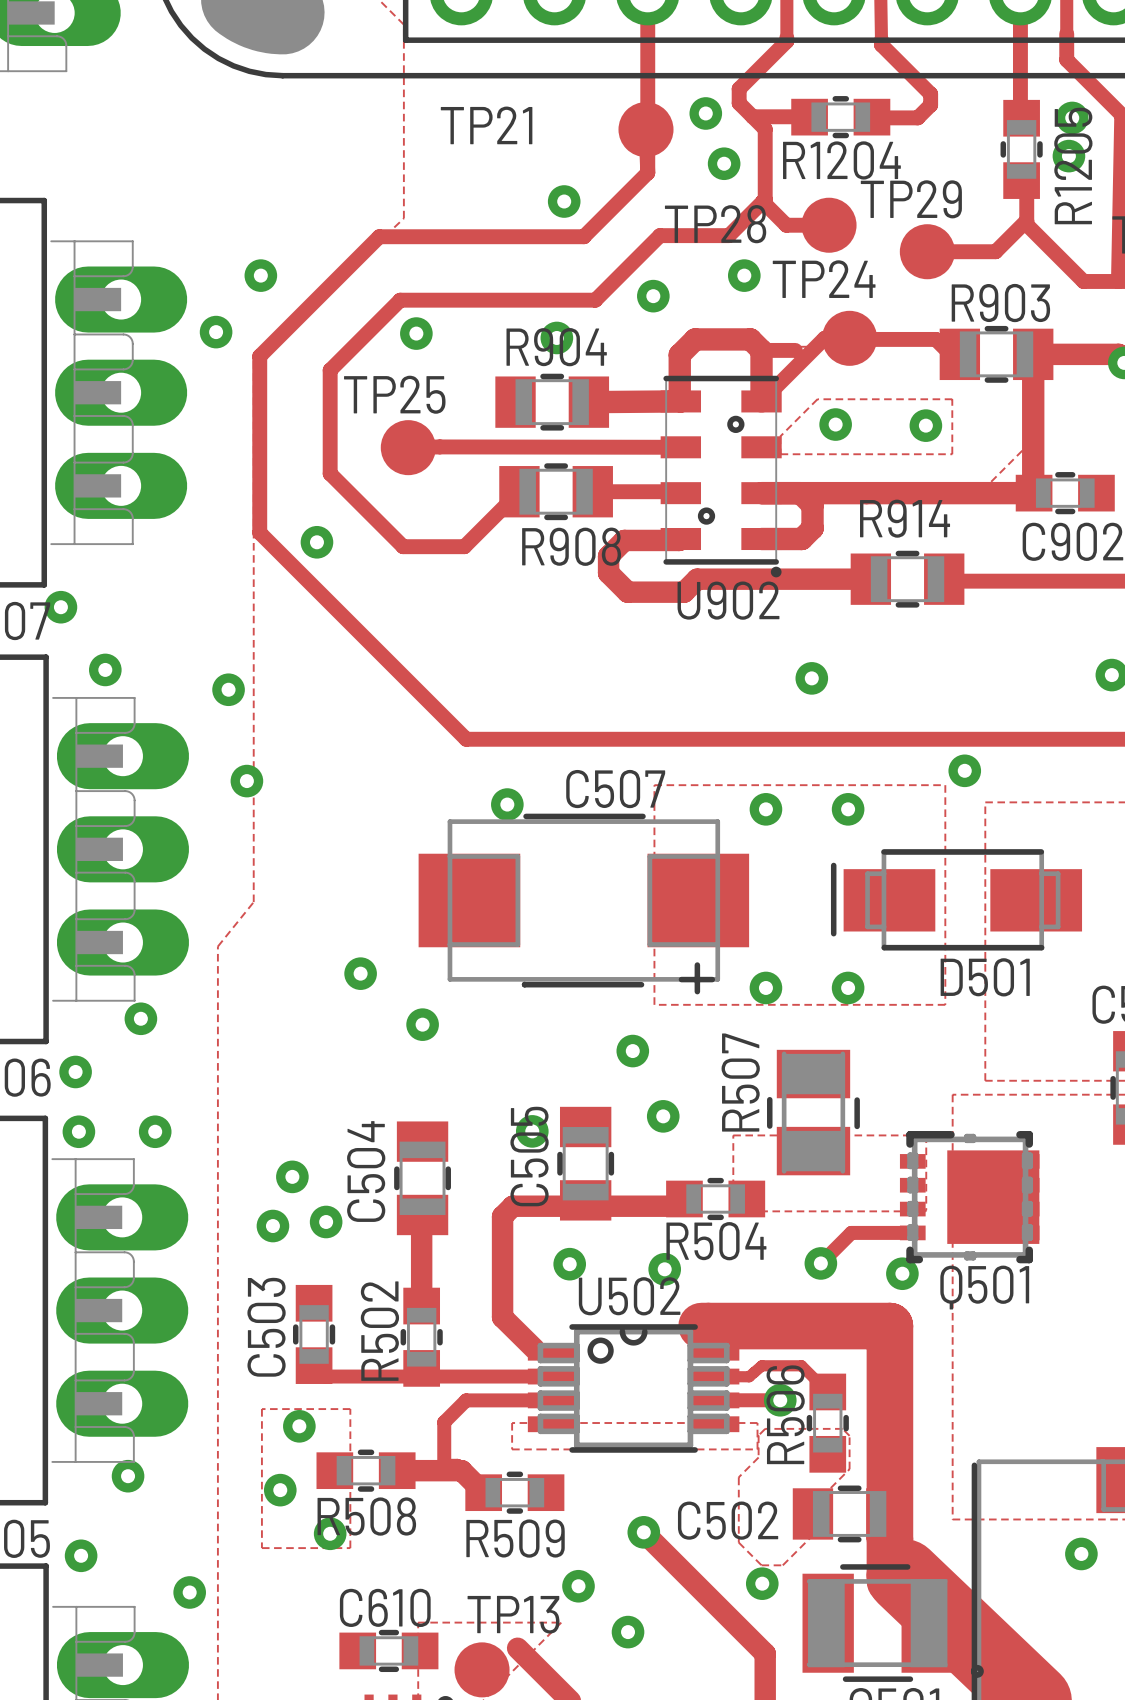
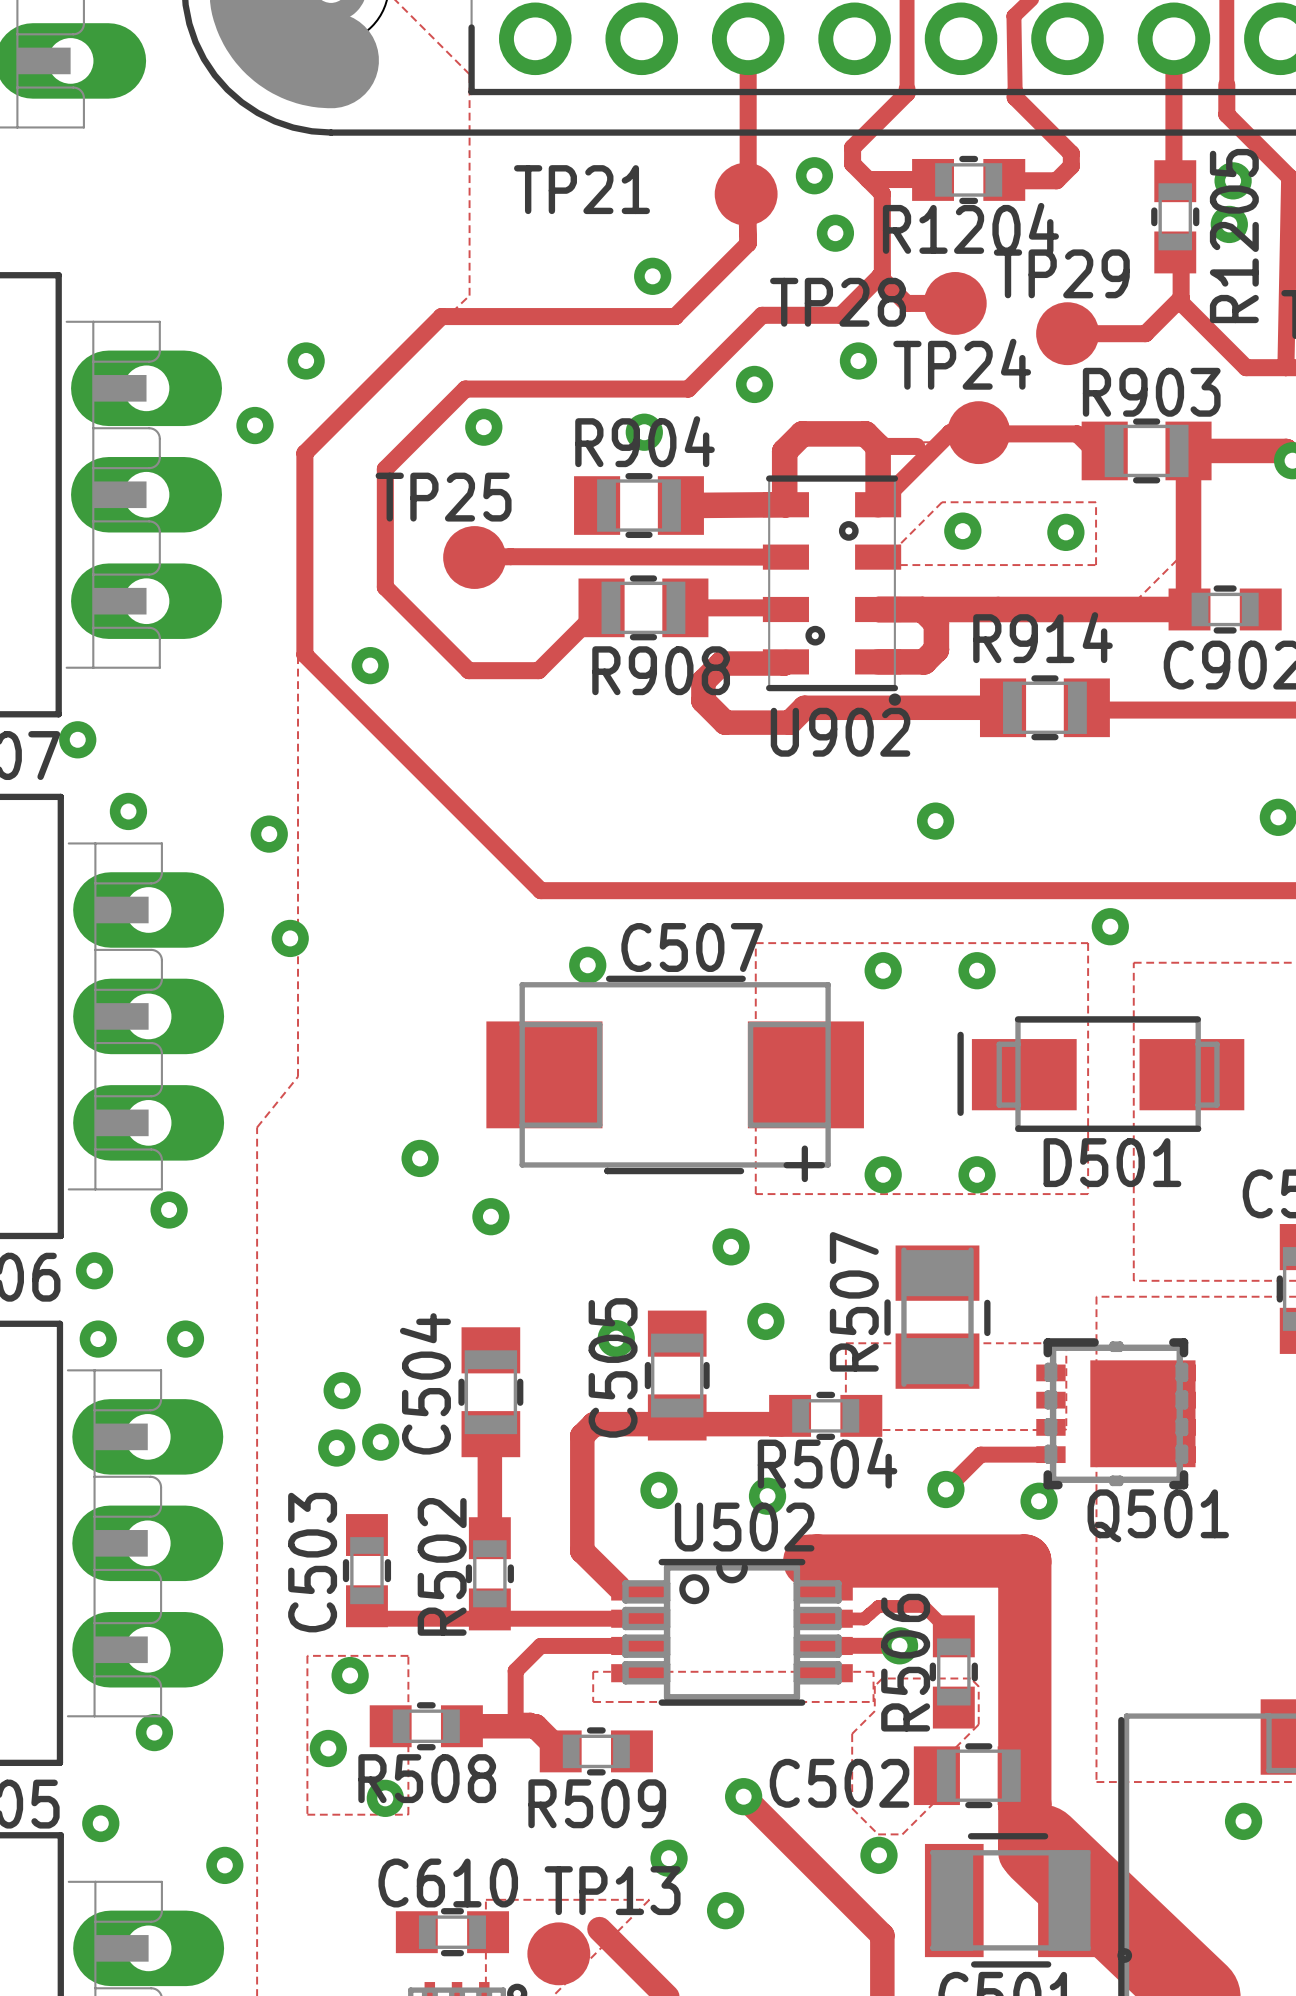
via position: (272, 1226) -> (336, 1448)

